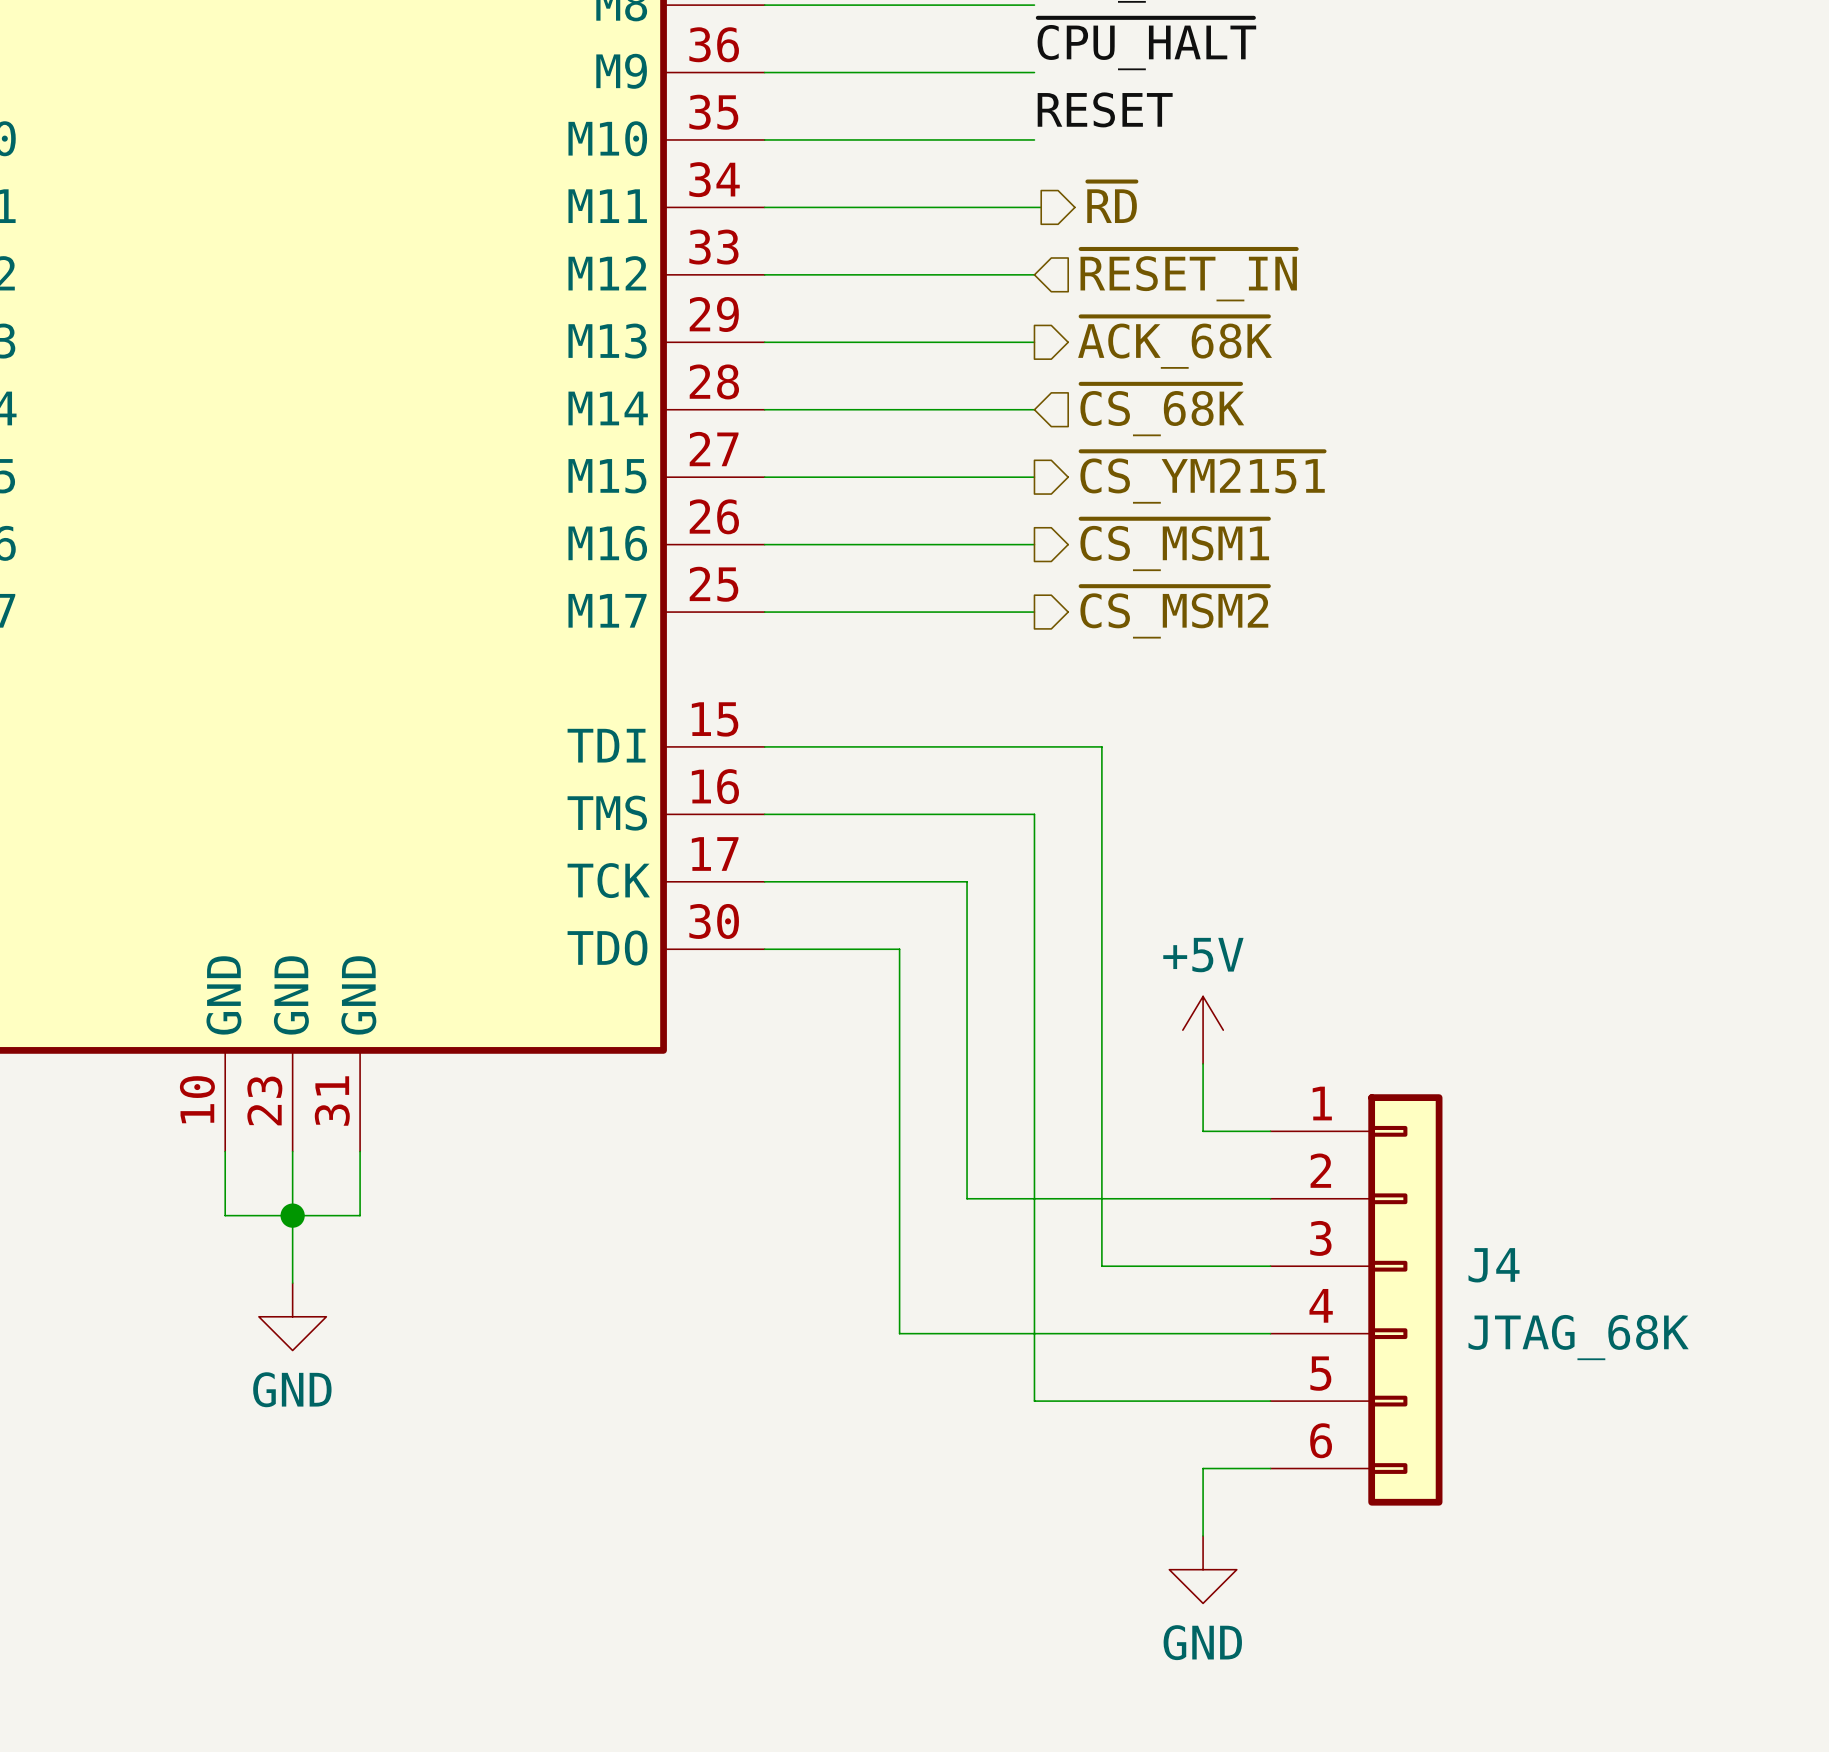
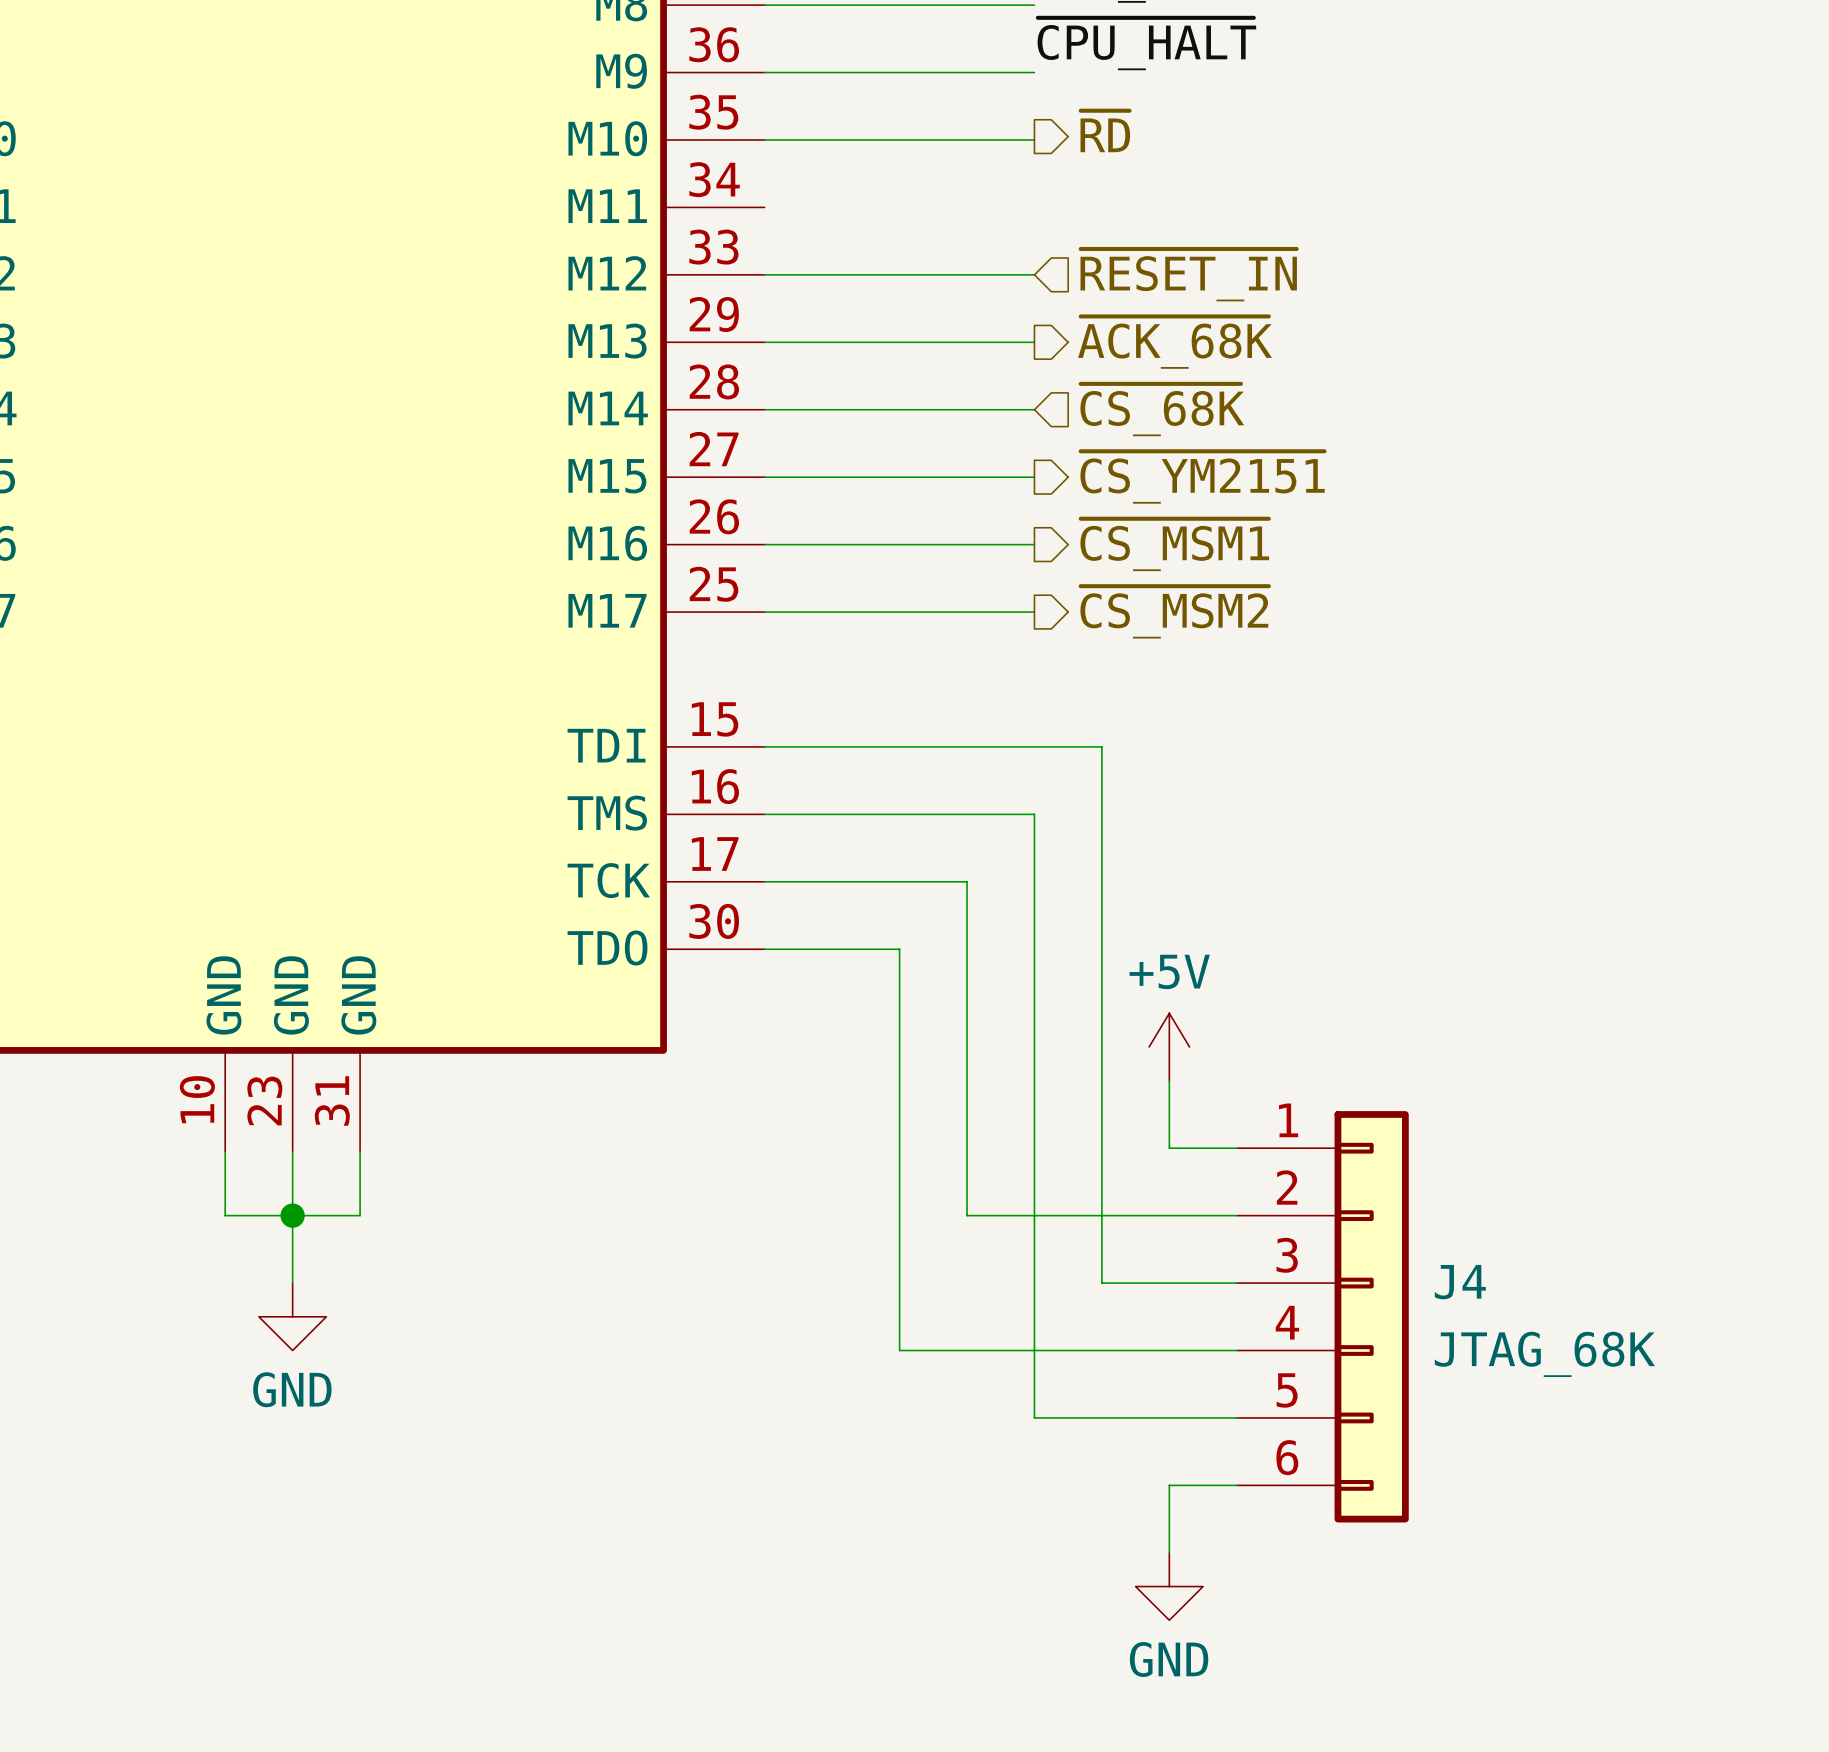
label: RESET (1105, 109) -> none
hierarchical label position: ~{RD} (1112, 202) -> ~{RD} (1105, 131)
wire: (764, 207) (1041, 207) -> none
power symbol position: +5V (1203, 1030) -> +5V (1169, 1047)
wire: (1203, 1063) (1203, 1131) (1270, 1131) -> (1169, 1080) (1169, 1148) (1236, 1148)
wire: (967, 1198) (1270, 1198) -> (967, 1198) (967, 1215) (1236, 1215)
wire: (1101, 1266) (1270, 1266) -> (1101, 1266) (1101, 1283) (1236, 1283)
J4 position: (1356, 1299) -> (1322, 1316)
wire: (899, 1333) (1270, 1333) -> (899, 1333) (899, 1350) (1236, 1350)
wire: (1034, 1401) (1270, 1401) -> (1034, 1401) (1034, 1417) (1236, 1417)
wire: (1270, 1468) (1203, 1468) (1203, 1535) -> (1236, 1485) (1169, 1485) (1169, 1552)
power symbol position: GND (1203, 1569) -> GND (1169, 1586)

